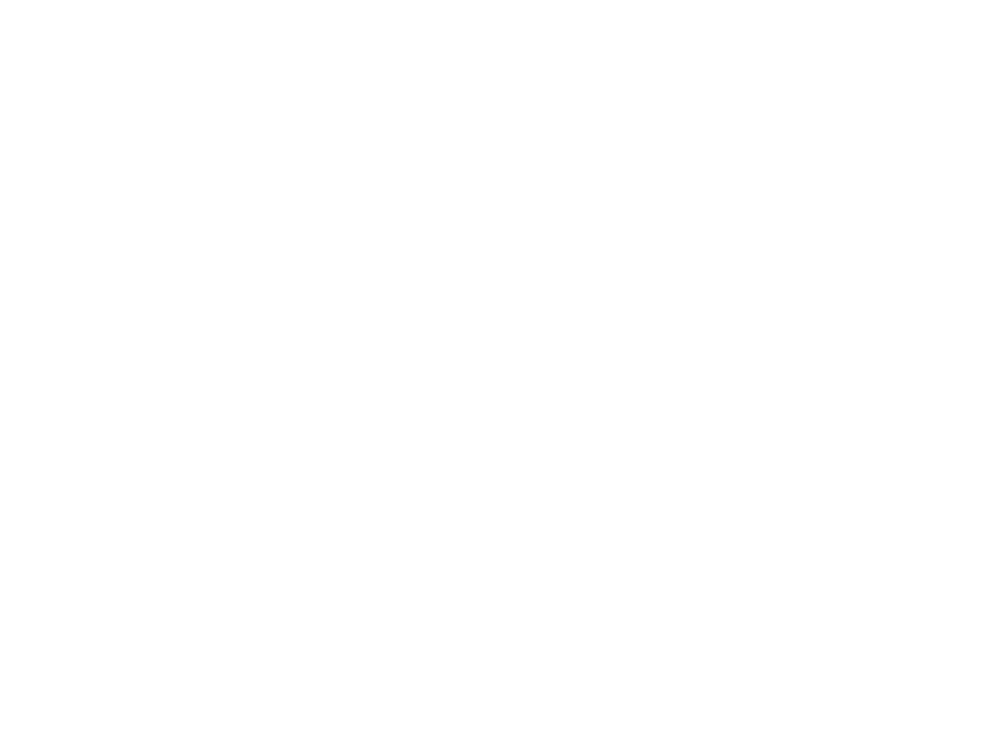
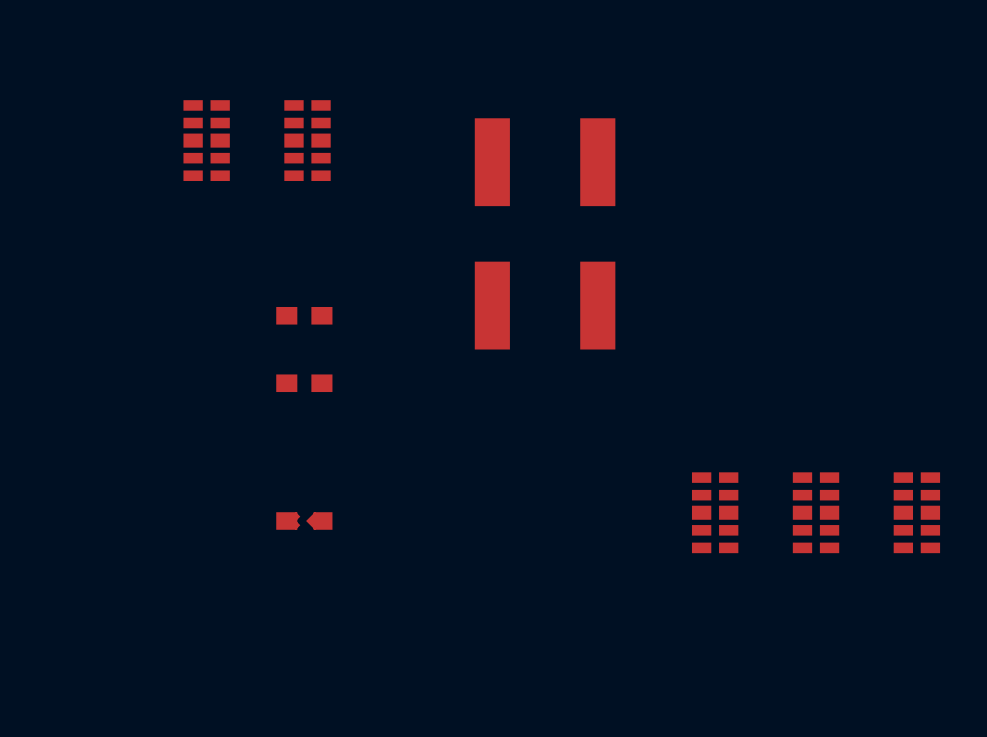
part: none -> (206, 140)
part: none -> (307, 140)
part: none -> (545, 162)
part: none -> (545, 305)
part: none -> (304, 315)
part: none -> (304, 383)
part: none -> (715, 512)
part: none -> (816, 512)
part: none -> (916, 512)
part: none -> (304, 521)

